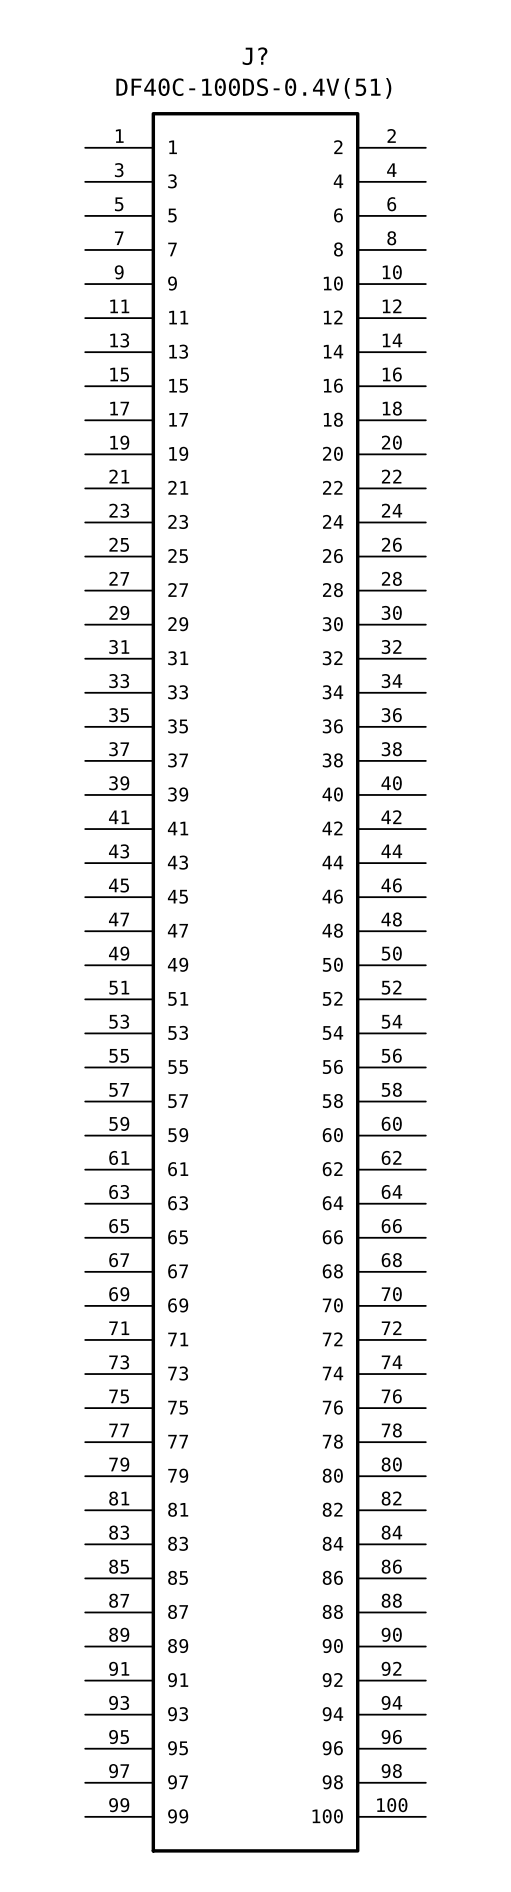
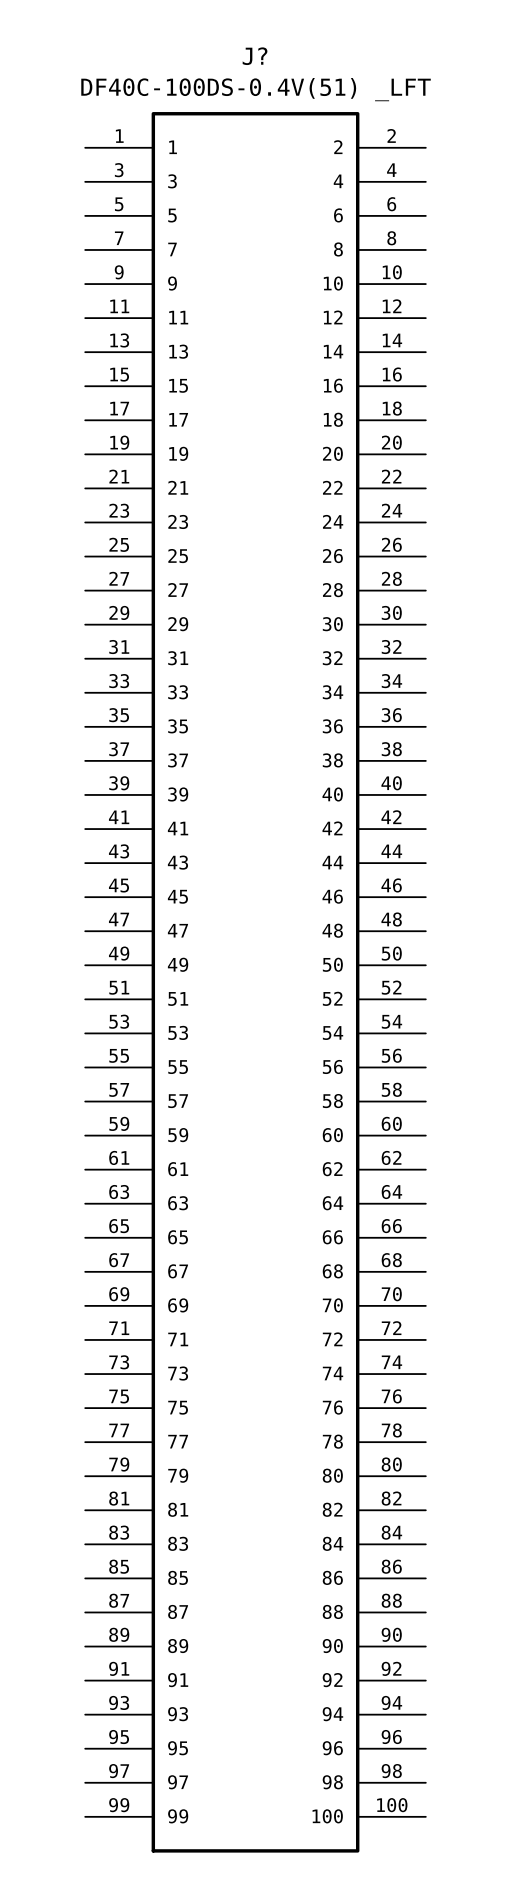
J? value: DF40C-100DS-0.4V(51) (253, 88) -> DF40C-100DS-0.4V(51) _LFT (256, 89)

